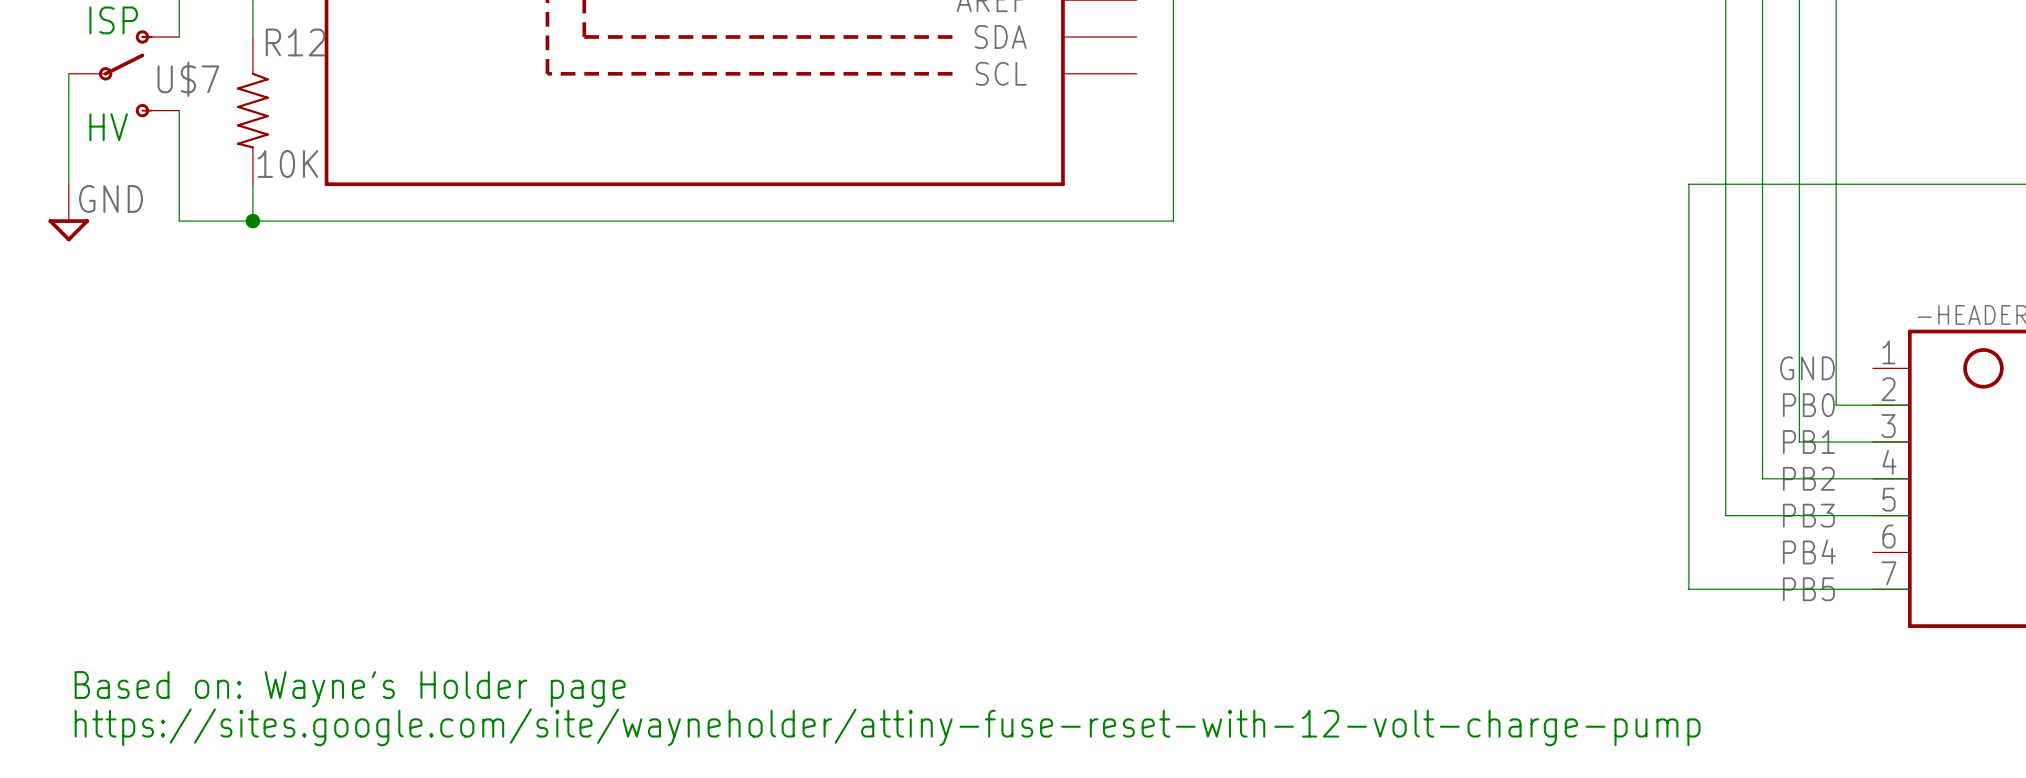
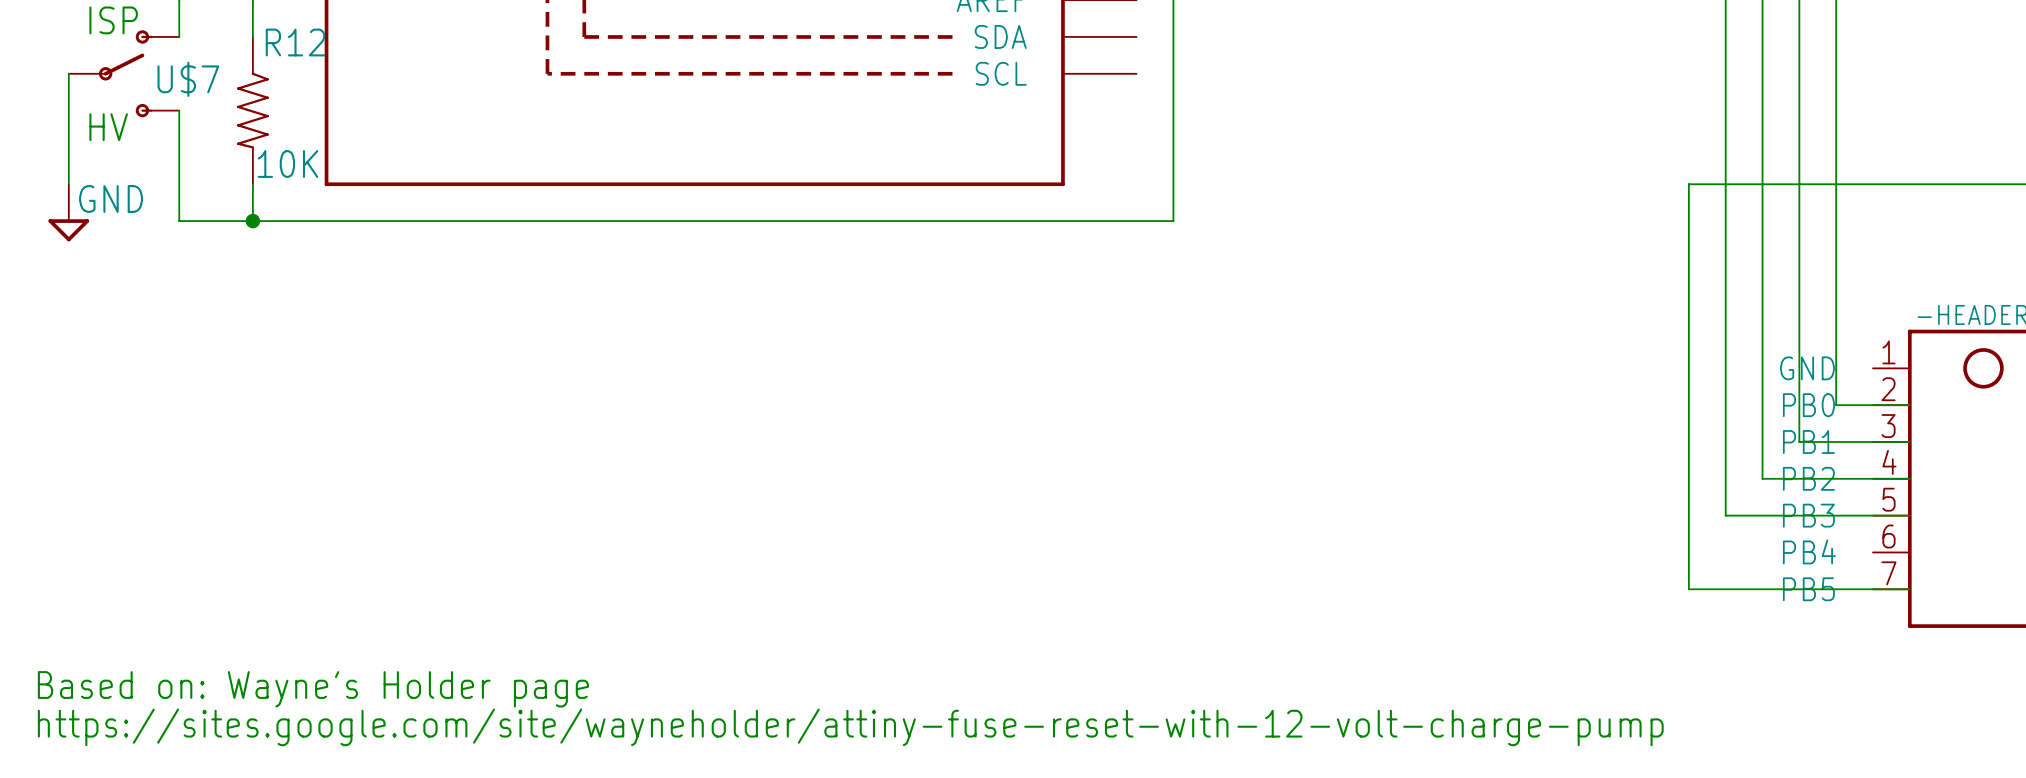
text position: Based on: Wayne's Holder page (350, 689) -> Based on: Wayne's Holder page (313, 689)
text position: https://sites.google.com/site/wayneholder/attiny-fuse-reset-with-12-volt-charge-pump (887, 727) -> https://sites.google.com/site/wayneholder/attiny-fuse-reset-with-12-volt-charge-pump (850, 727)

